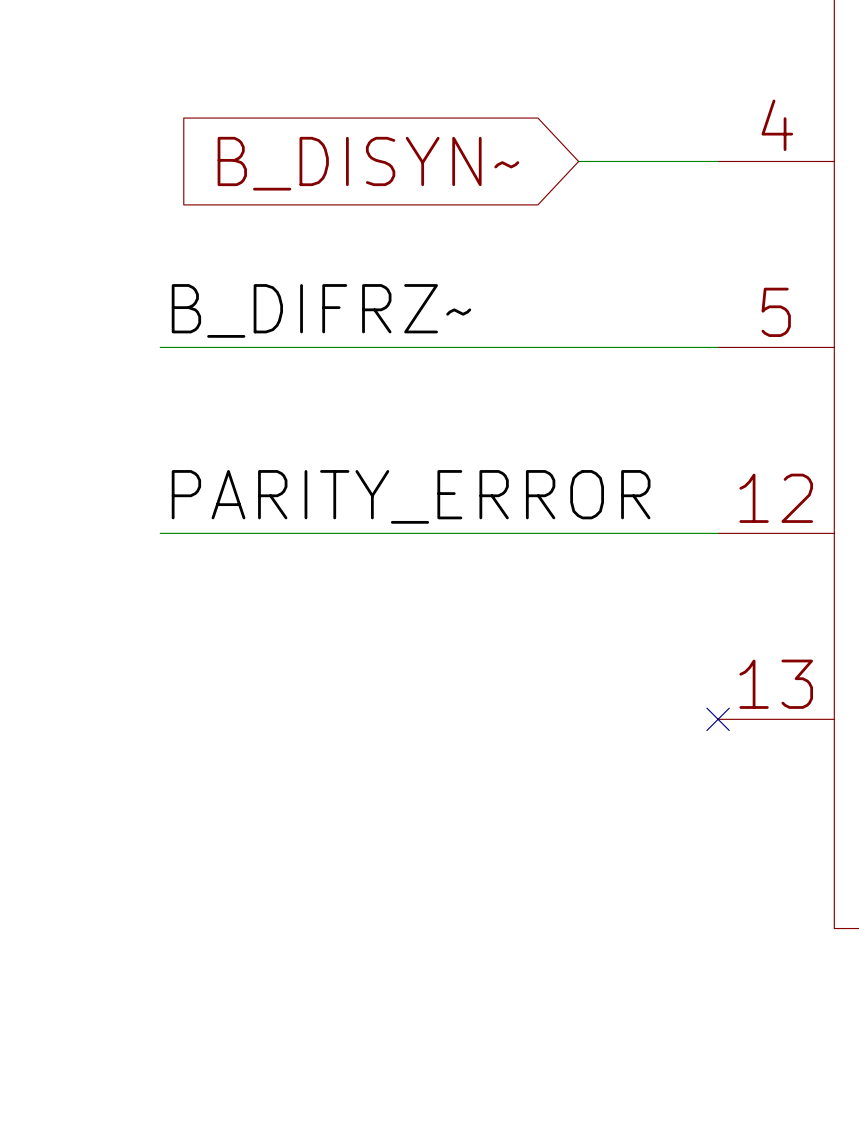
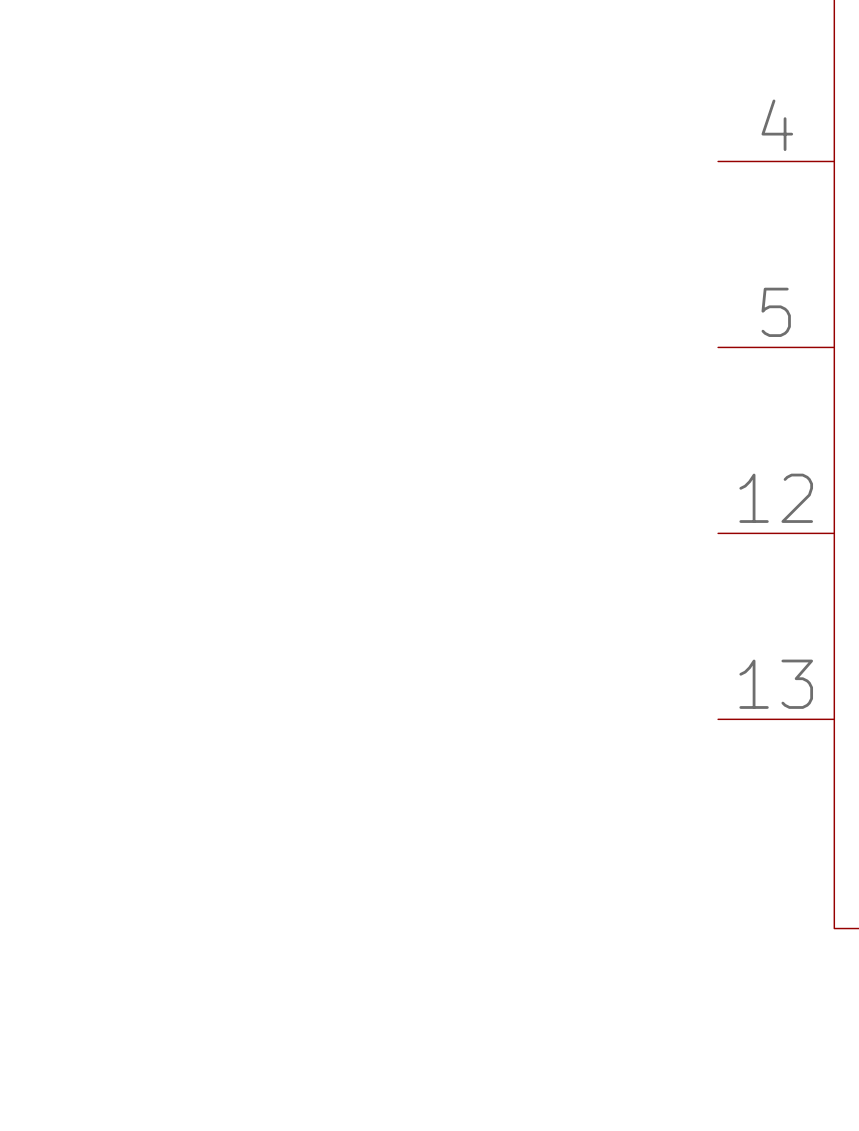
wire: (578, 161) (718, 161) -> none
global label: B_DISYN~ (368, 163) -> none
label: B_DIFRZ~ (321, 310) -> none
wire: (160, 347) (718, 347) -> none
label: PARITY_ERROR (411, 496) -> none
wire: (160, 533) (718, 533) -> none
no-connect mark: (718, 719) -> none

